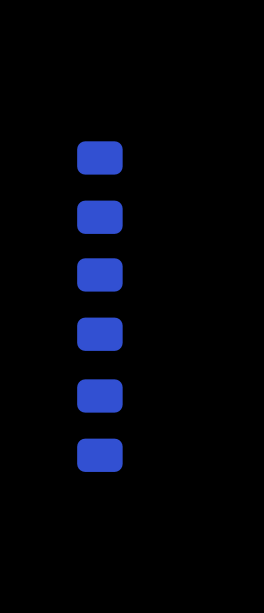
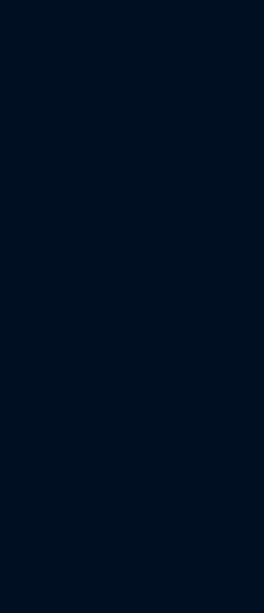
part: (99, 187) -> none
part: (99, 304) -> none
part: (99, 425) -> none

